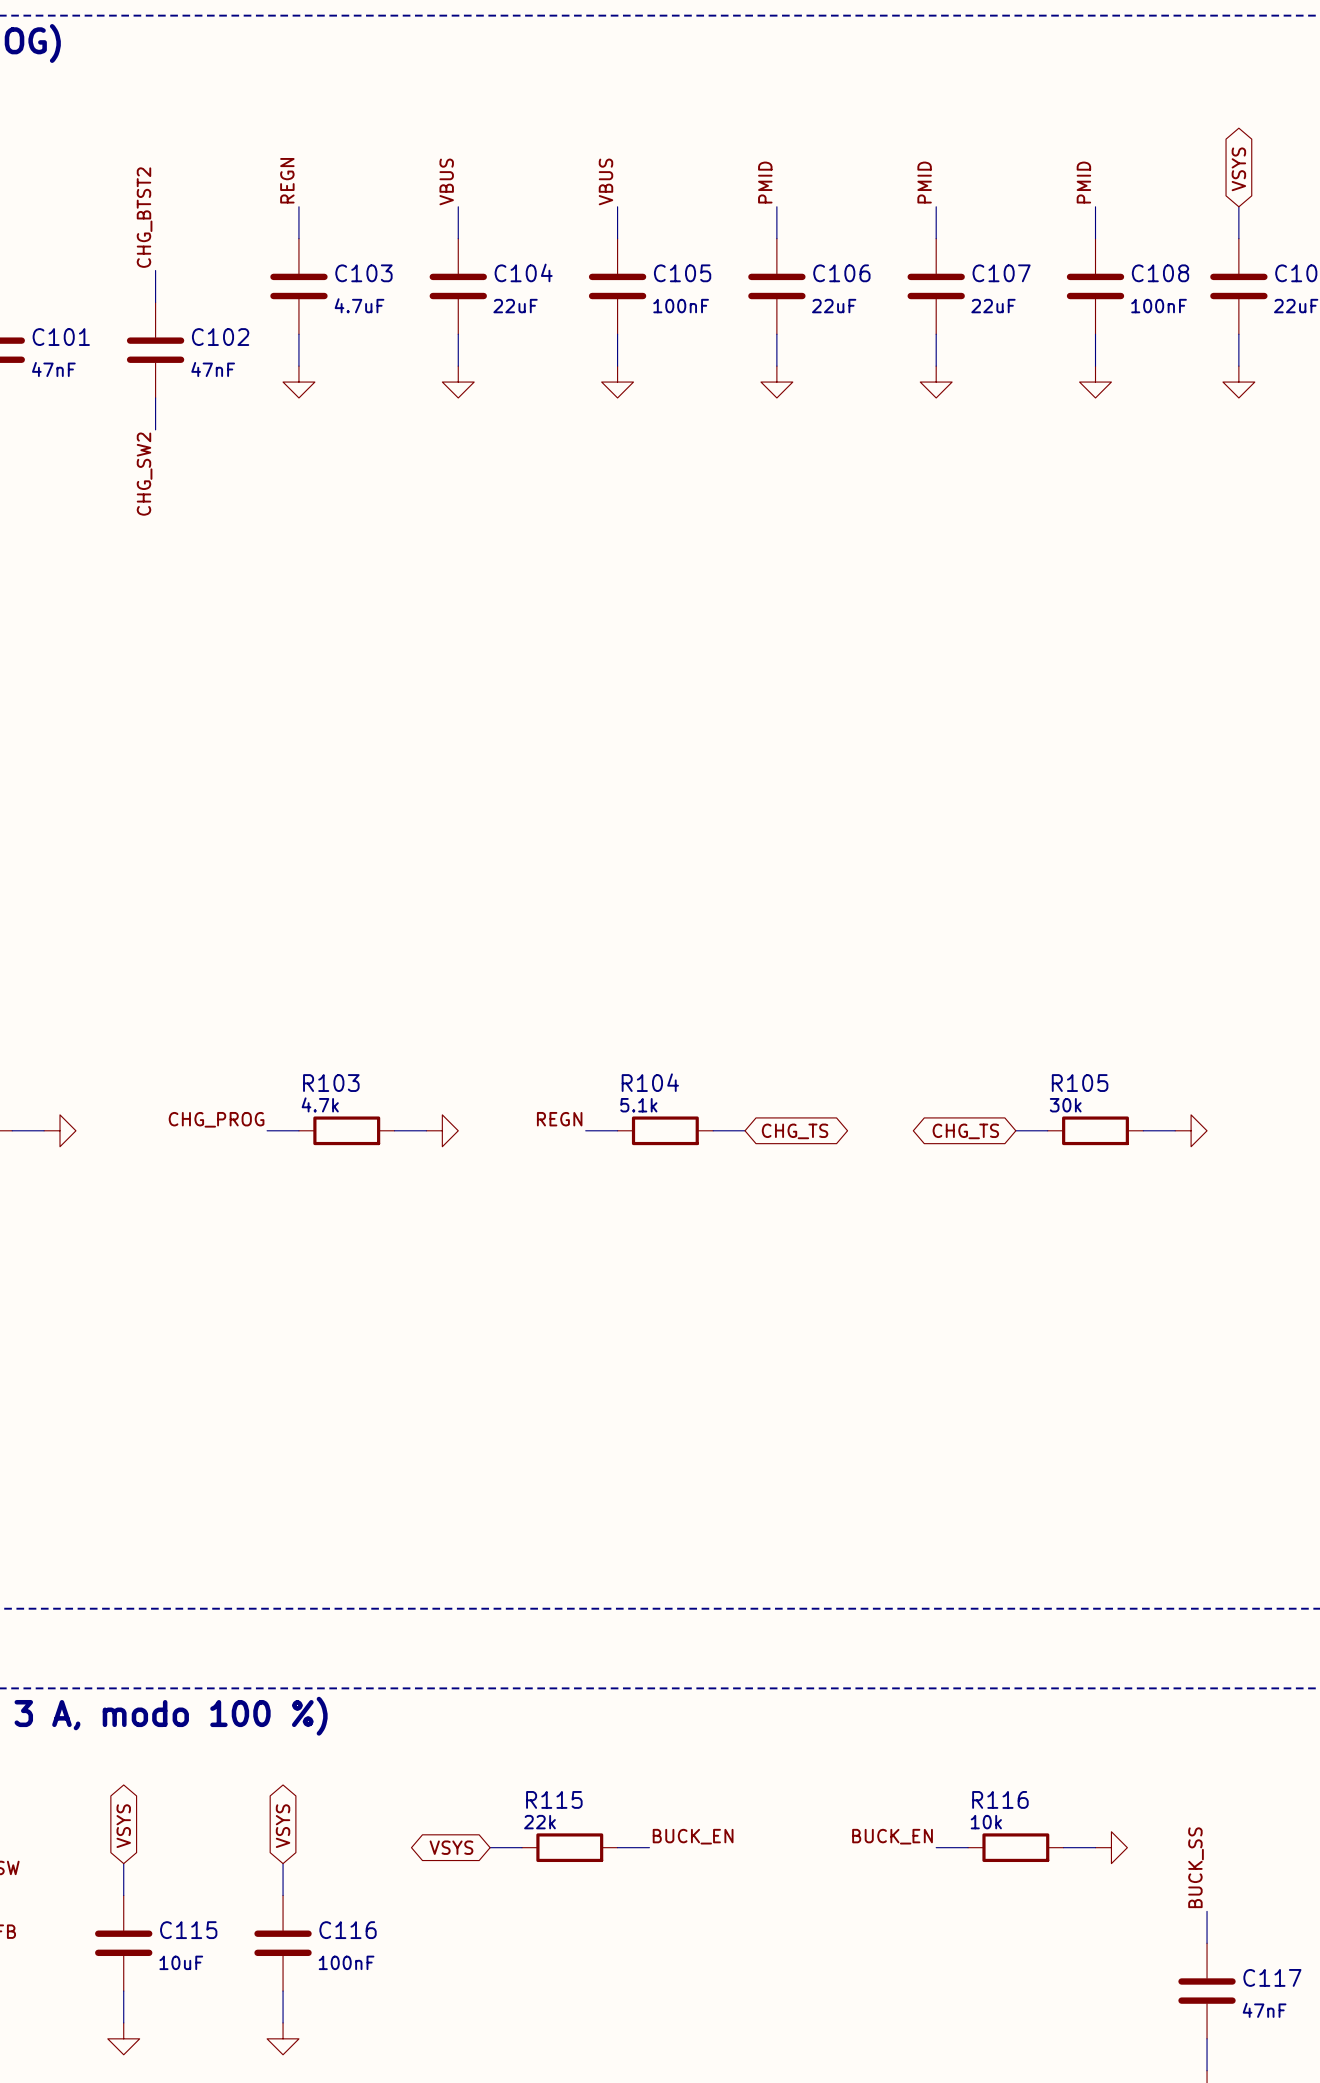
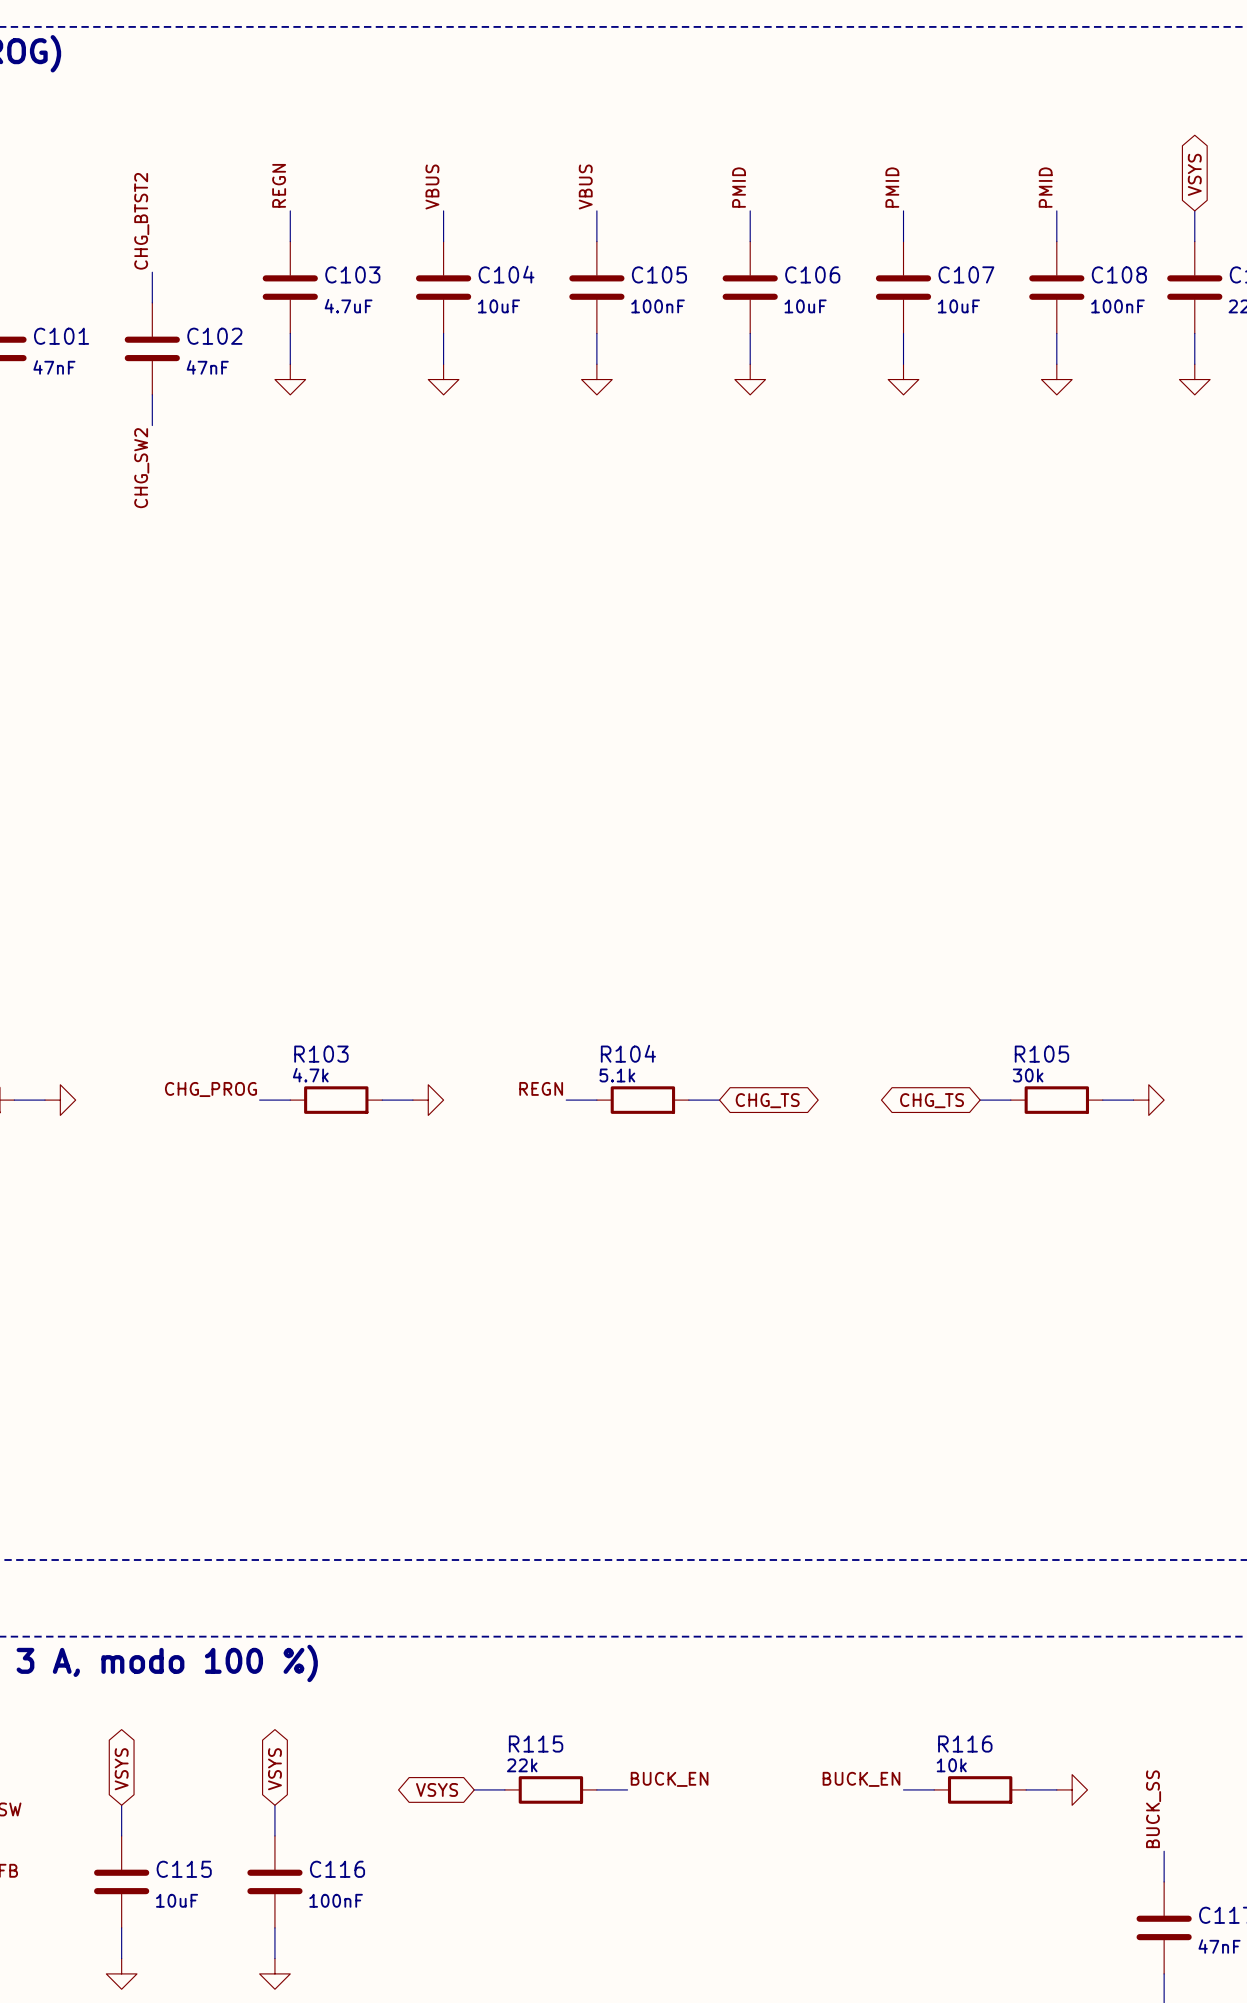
C104 value: 22uF (515, 306) -> 10uF (498, 306)
C106 value: 22uF (834, 306) -> 10uF (805, 306)
C107 value: 22uF (993, 306) -> 10uF (958, 306)

